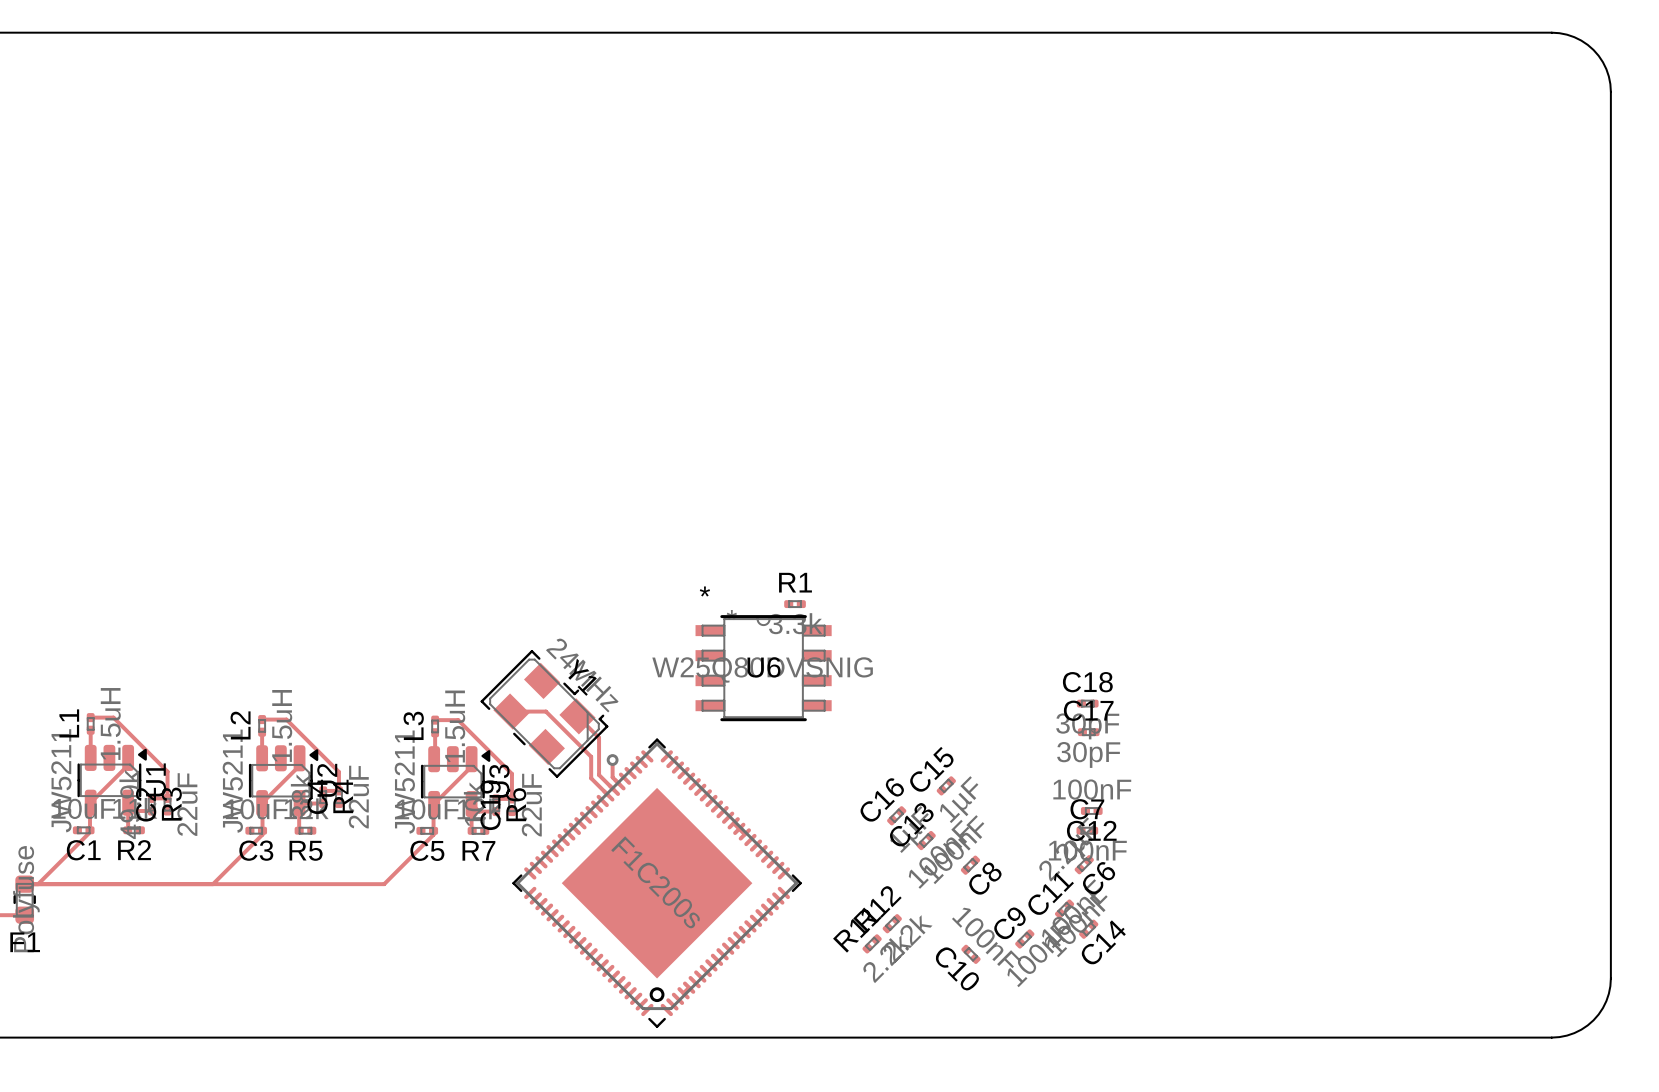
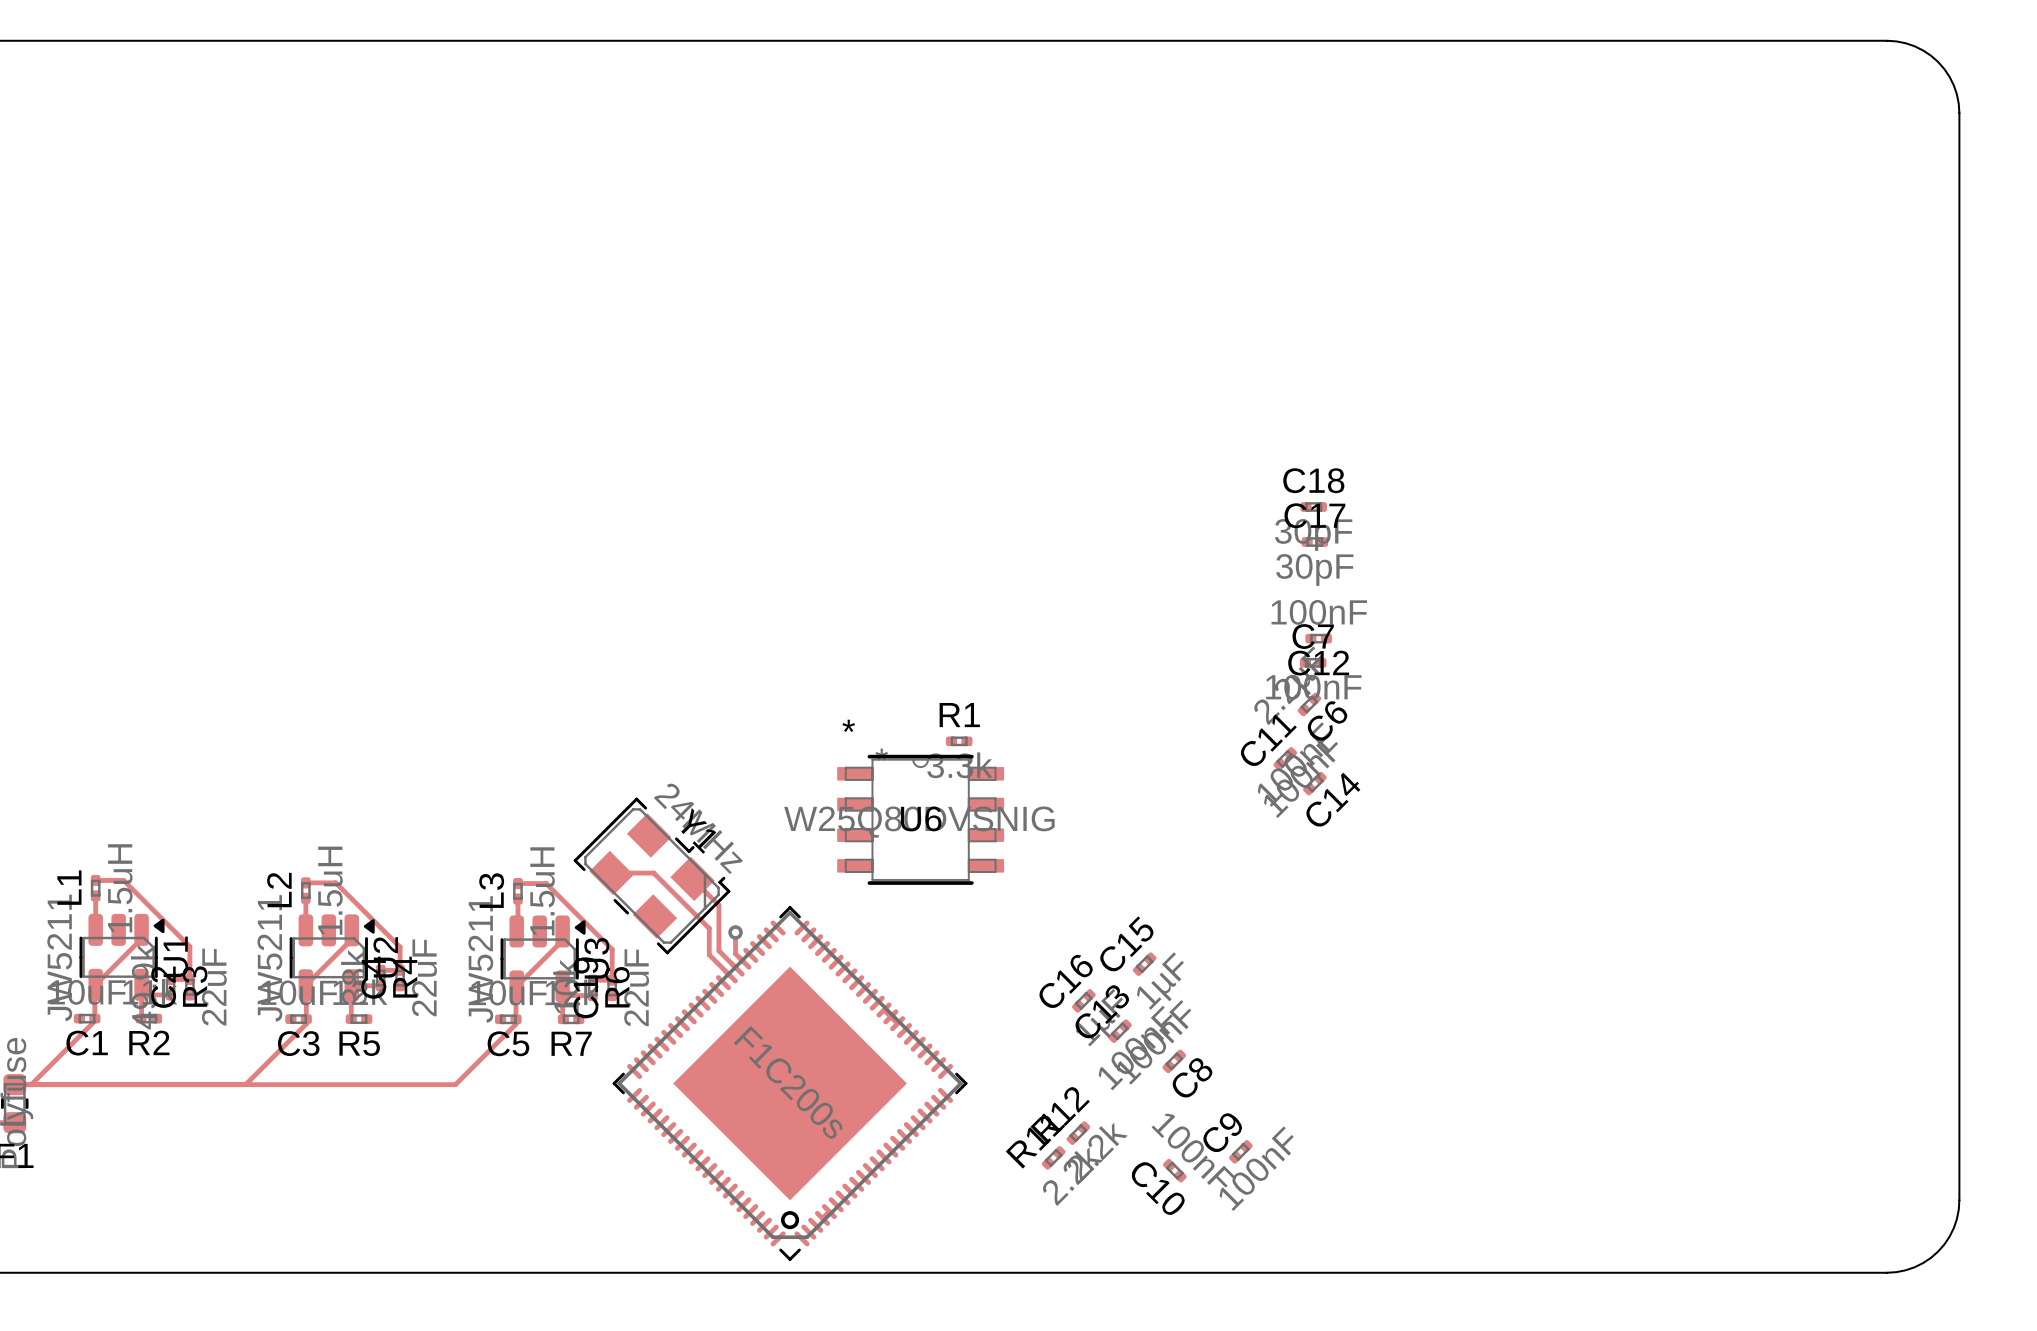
C18 position: (1087, 703) -> (1313, 507)
C17 position: (1088, 732) -> (1314, 542)
C12 position: (1091, 811) -> (1318, 638)
C7 position: (1087, 830) -> (1313, 662)
C6 position: (1084, 864) -> (1309, 704)
C11 position: (1064, 909) -> (1285, 758)
C14 position: (1088, 929) -> (1314, 783)

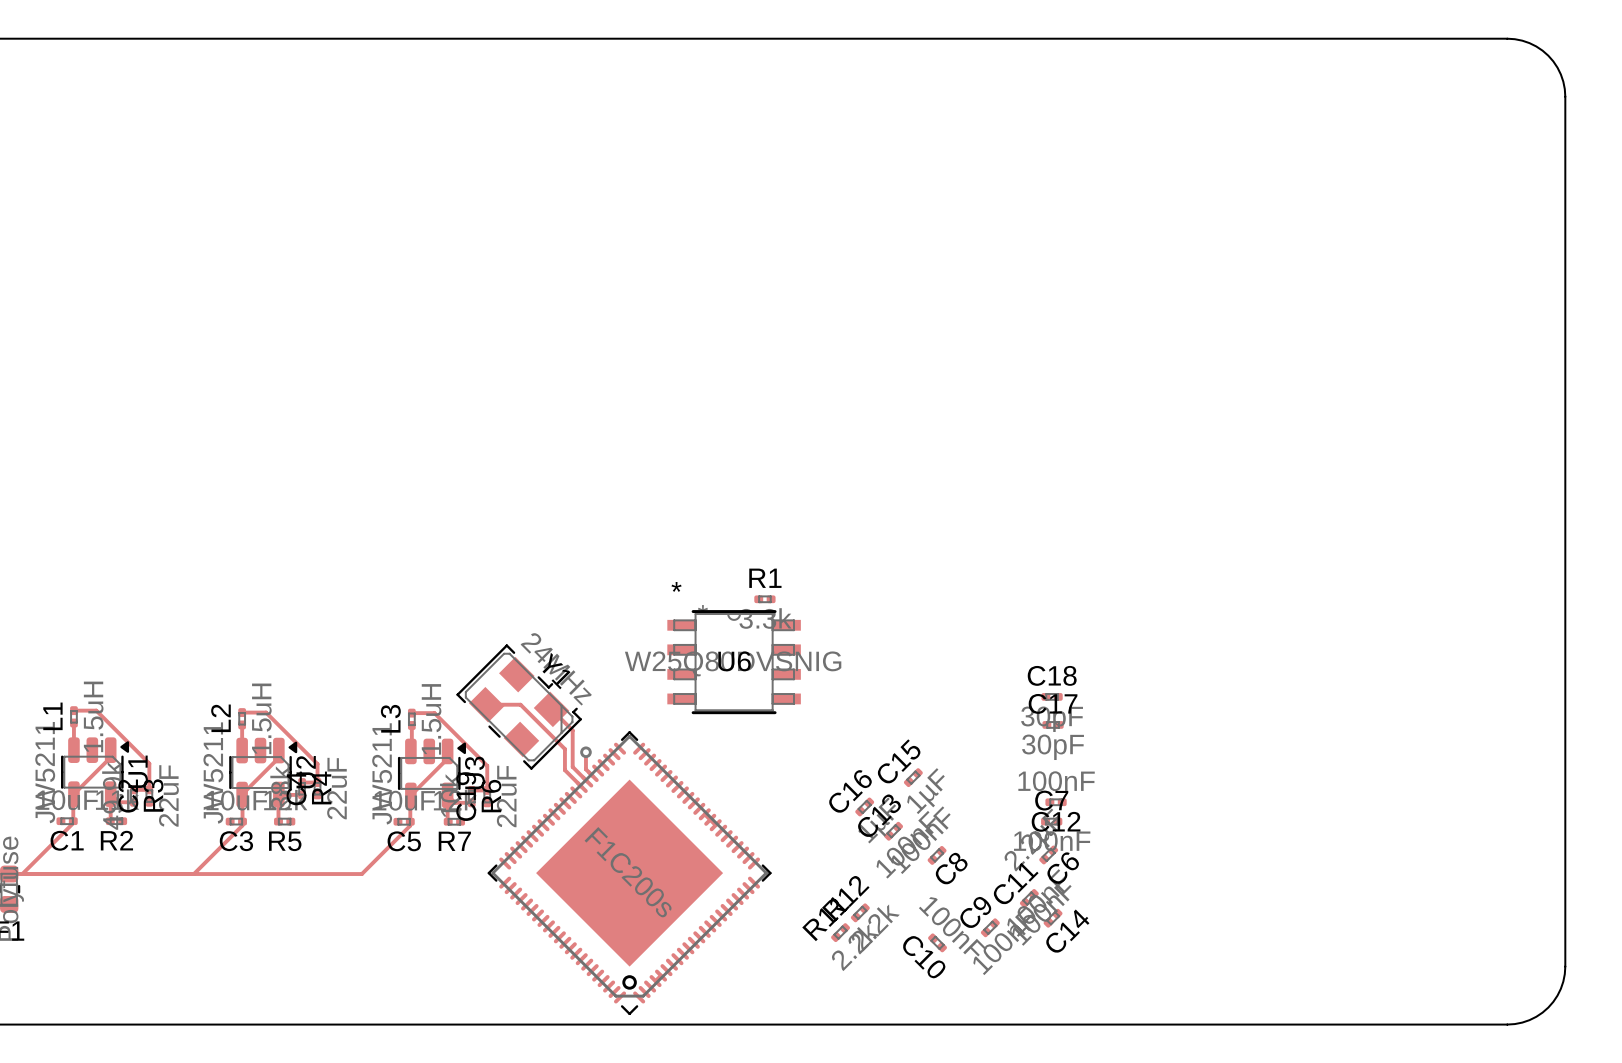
C18 position: (1313, 507) -> (1052, 696)
C17 position: (1314, 542) -> (1053, 724)
C12 position: (1318, 638) -> (1056, 802)
C7 position: (1313, 662) -> (1051, 821)
C6 position: (1309, 704) -> (1048, 854)
C11 position: (1285, 758) -> (1029, 898)
C14 position: (1314, 783) -> (1053, 918)

